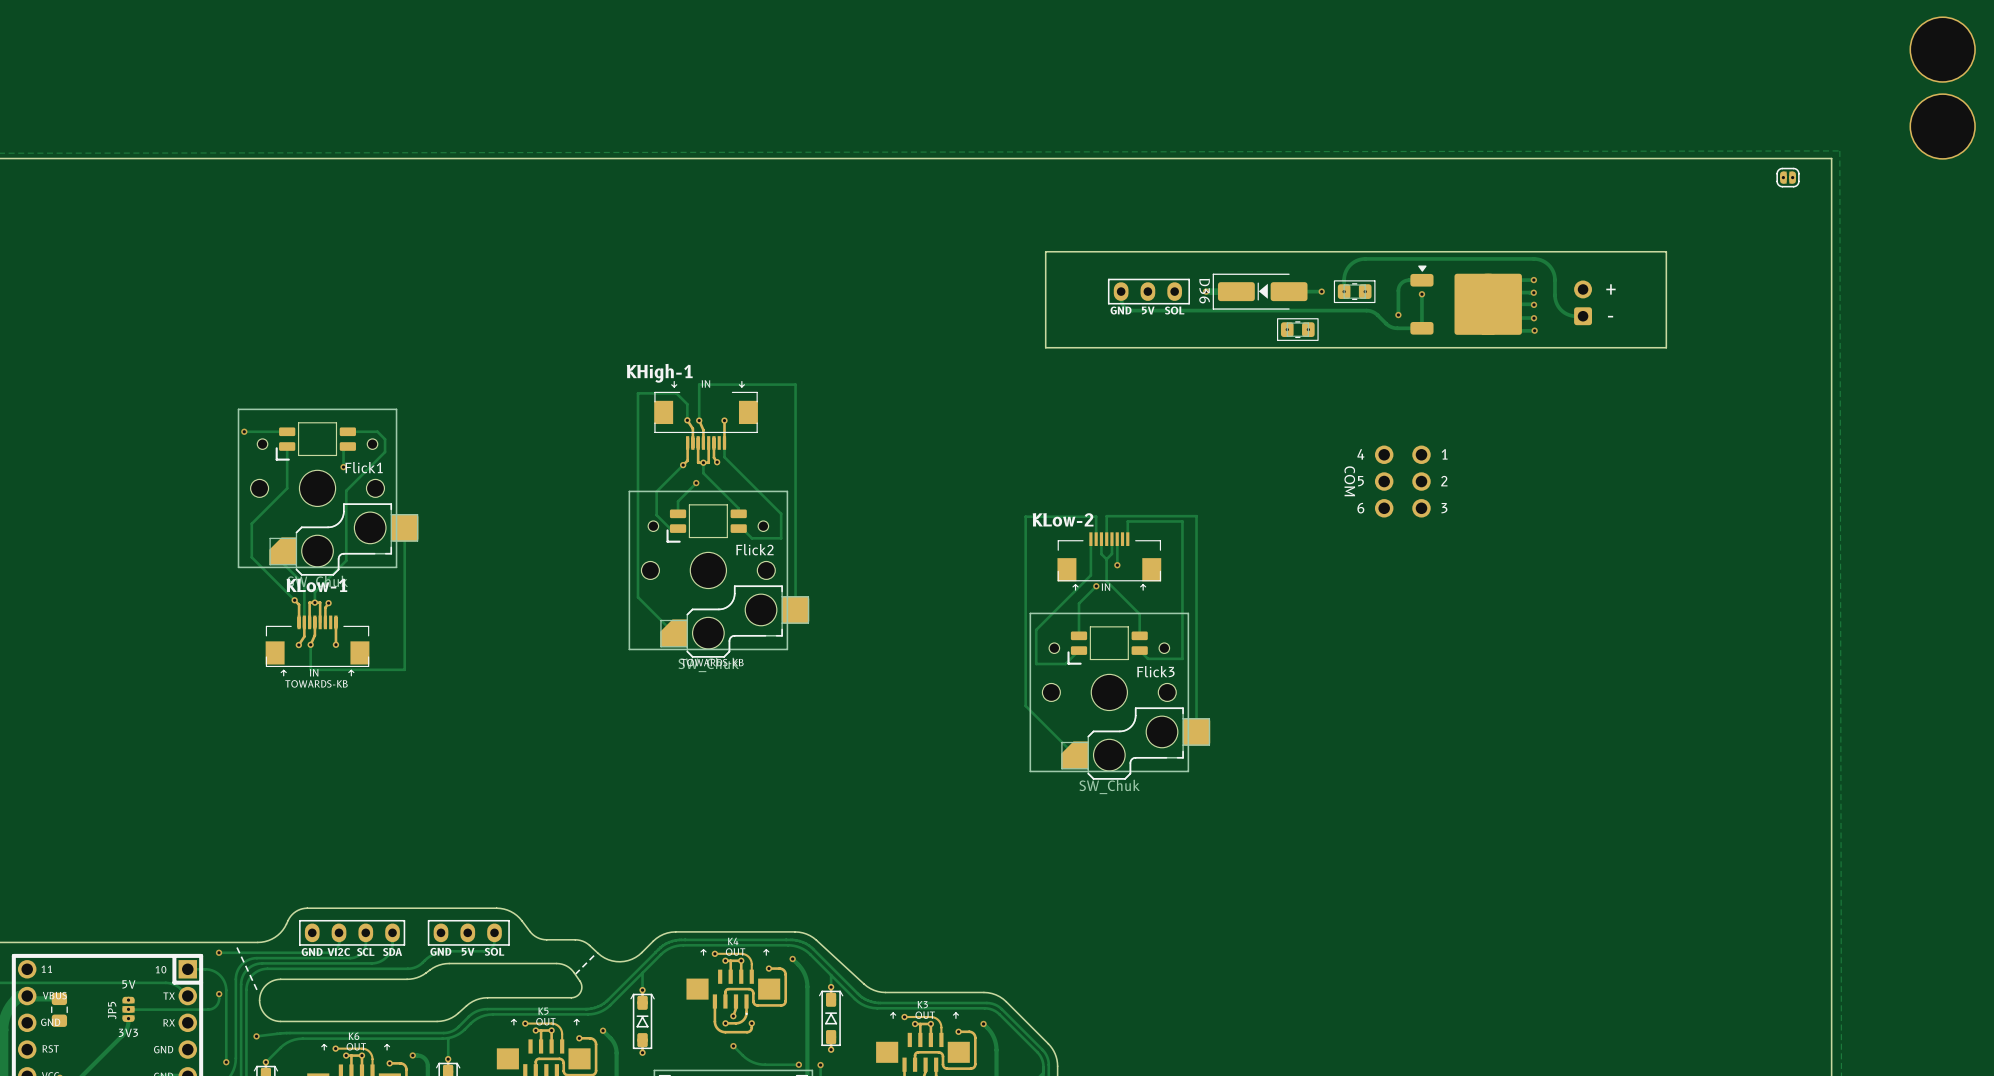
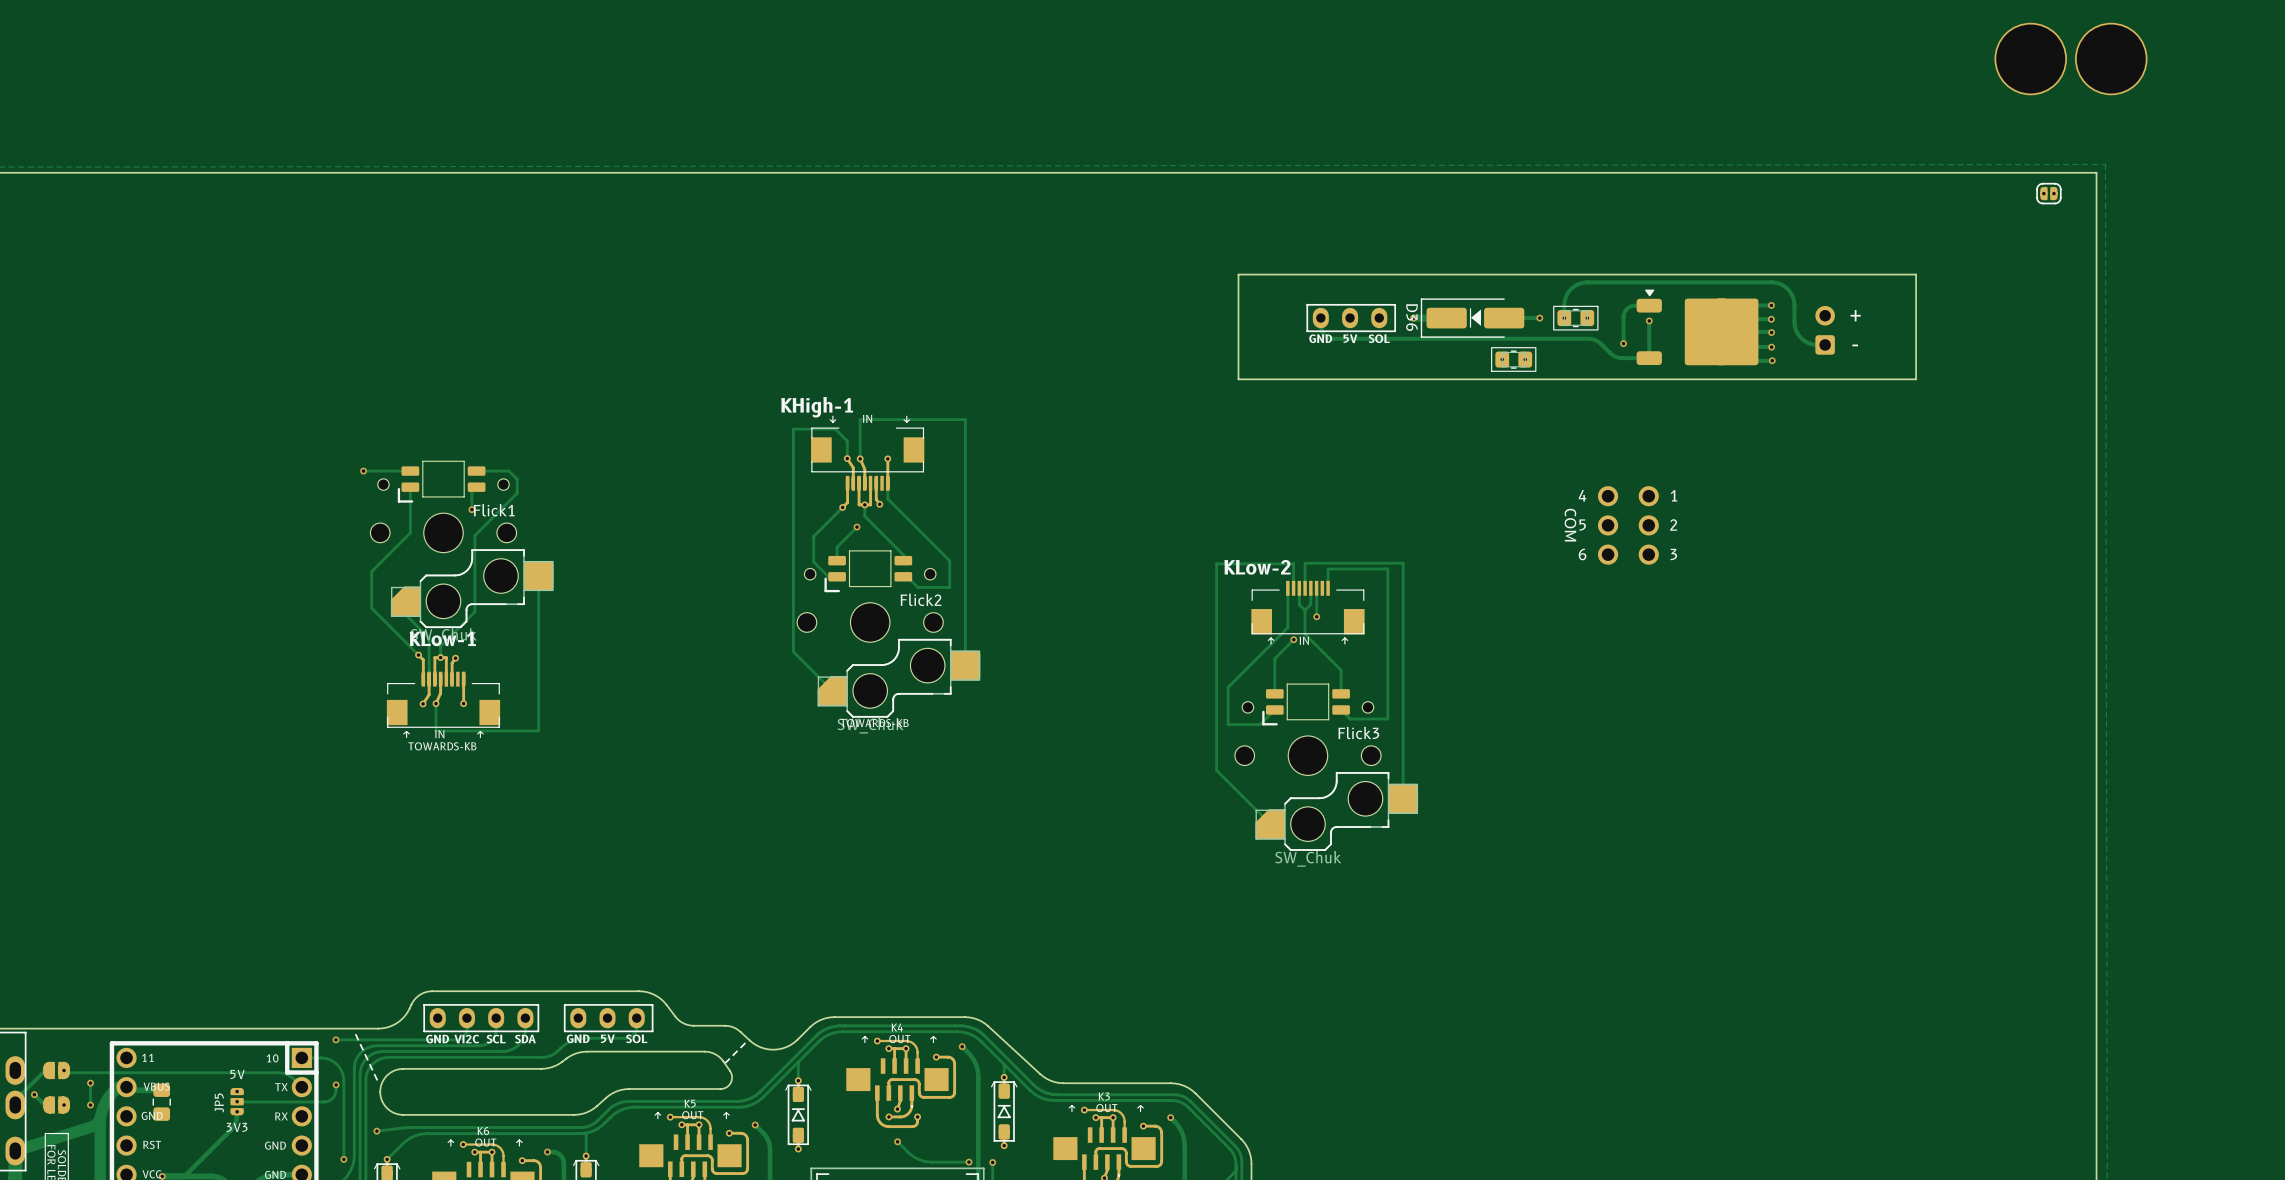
part: (1942, 49) -> none
part: none -> (2030, 59)
part: none -> (2111, 59)
part: (1942, 126) -> none
Flick1 footprint: [237, 408, 419, 576] -> [370, 460, 554, 629]
Flick2 footprint: [628, 490, 810, 658] -> [797, 550, 981, 718]
Flick3 footprint: [1029, 612, 1211, 780] -> [1234, 683, 1419, 851]

